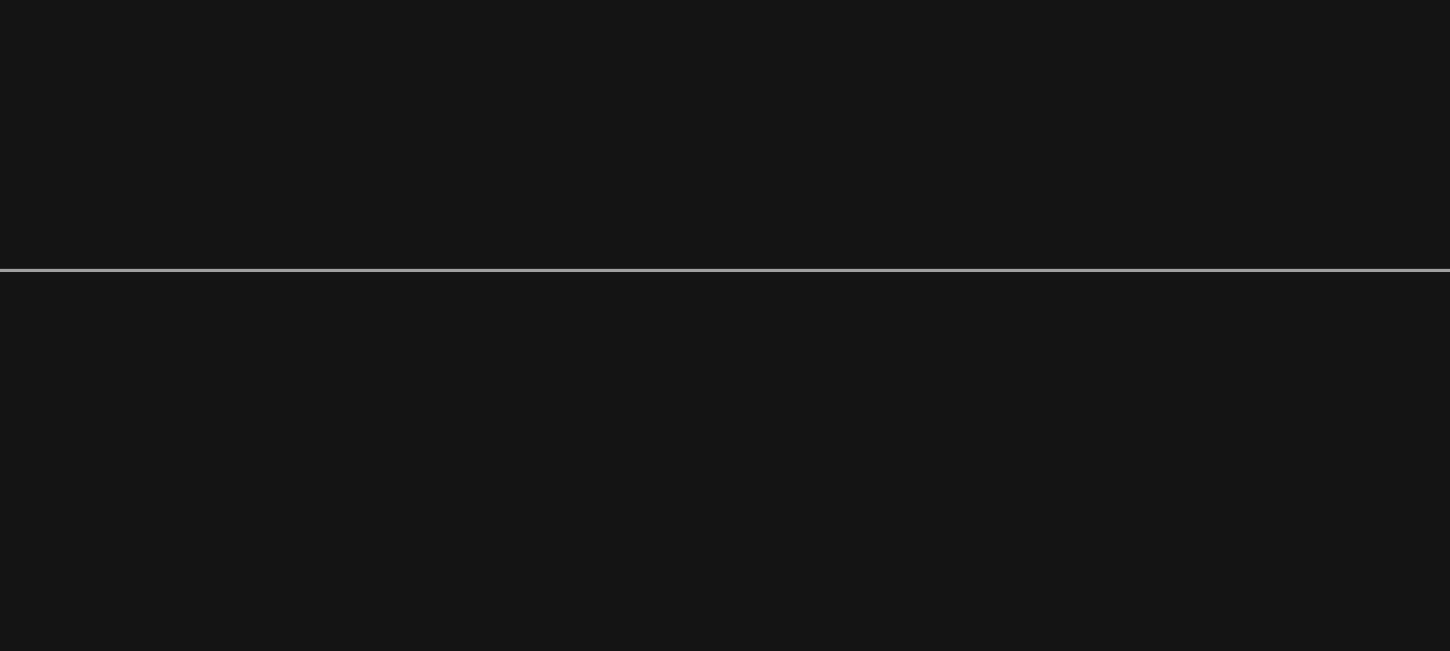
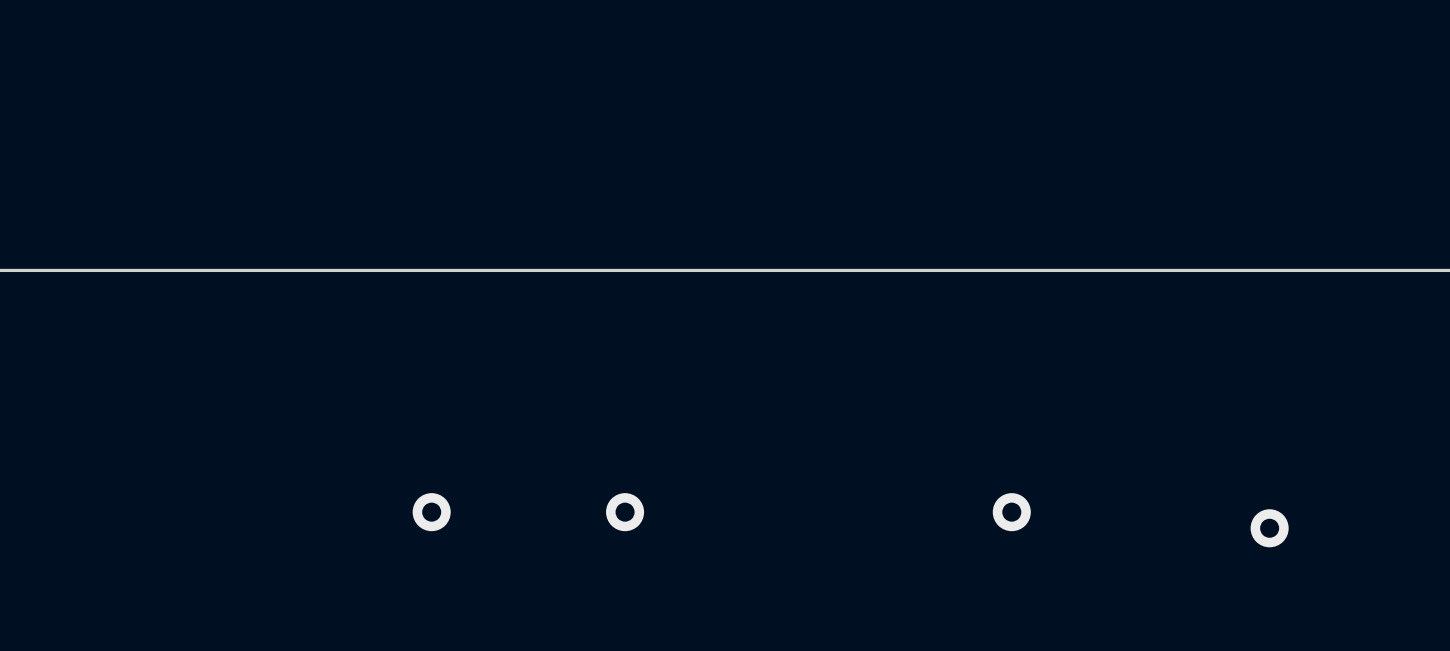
via: none -> (431, 512)
via: none -> (625, 512)
via: none -> (1011, 512)
via: none -> (1269, 528)

